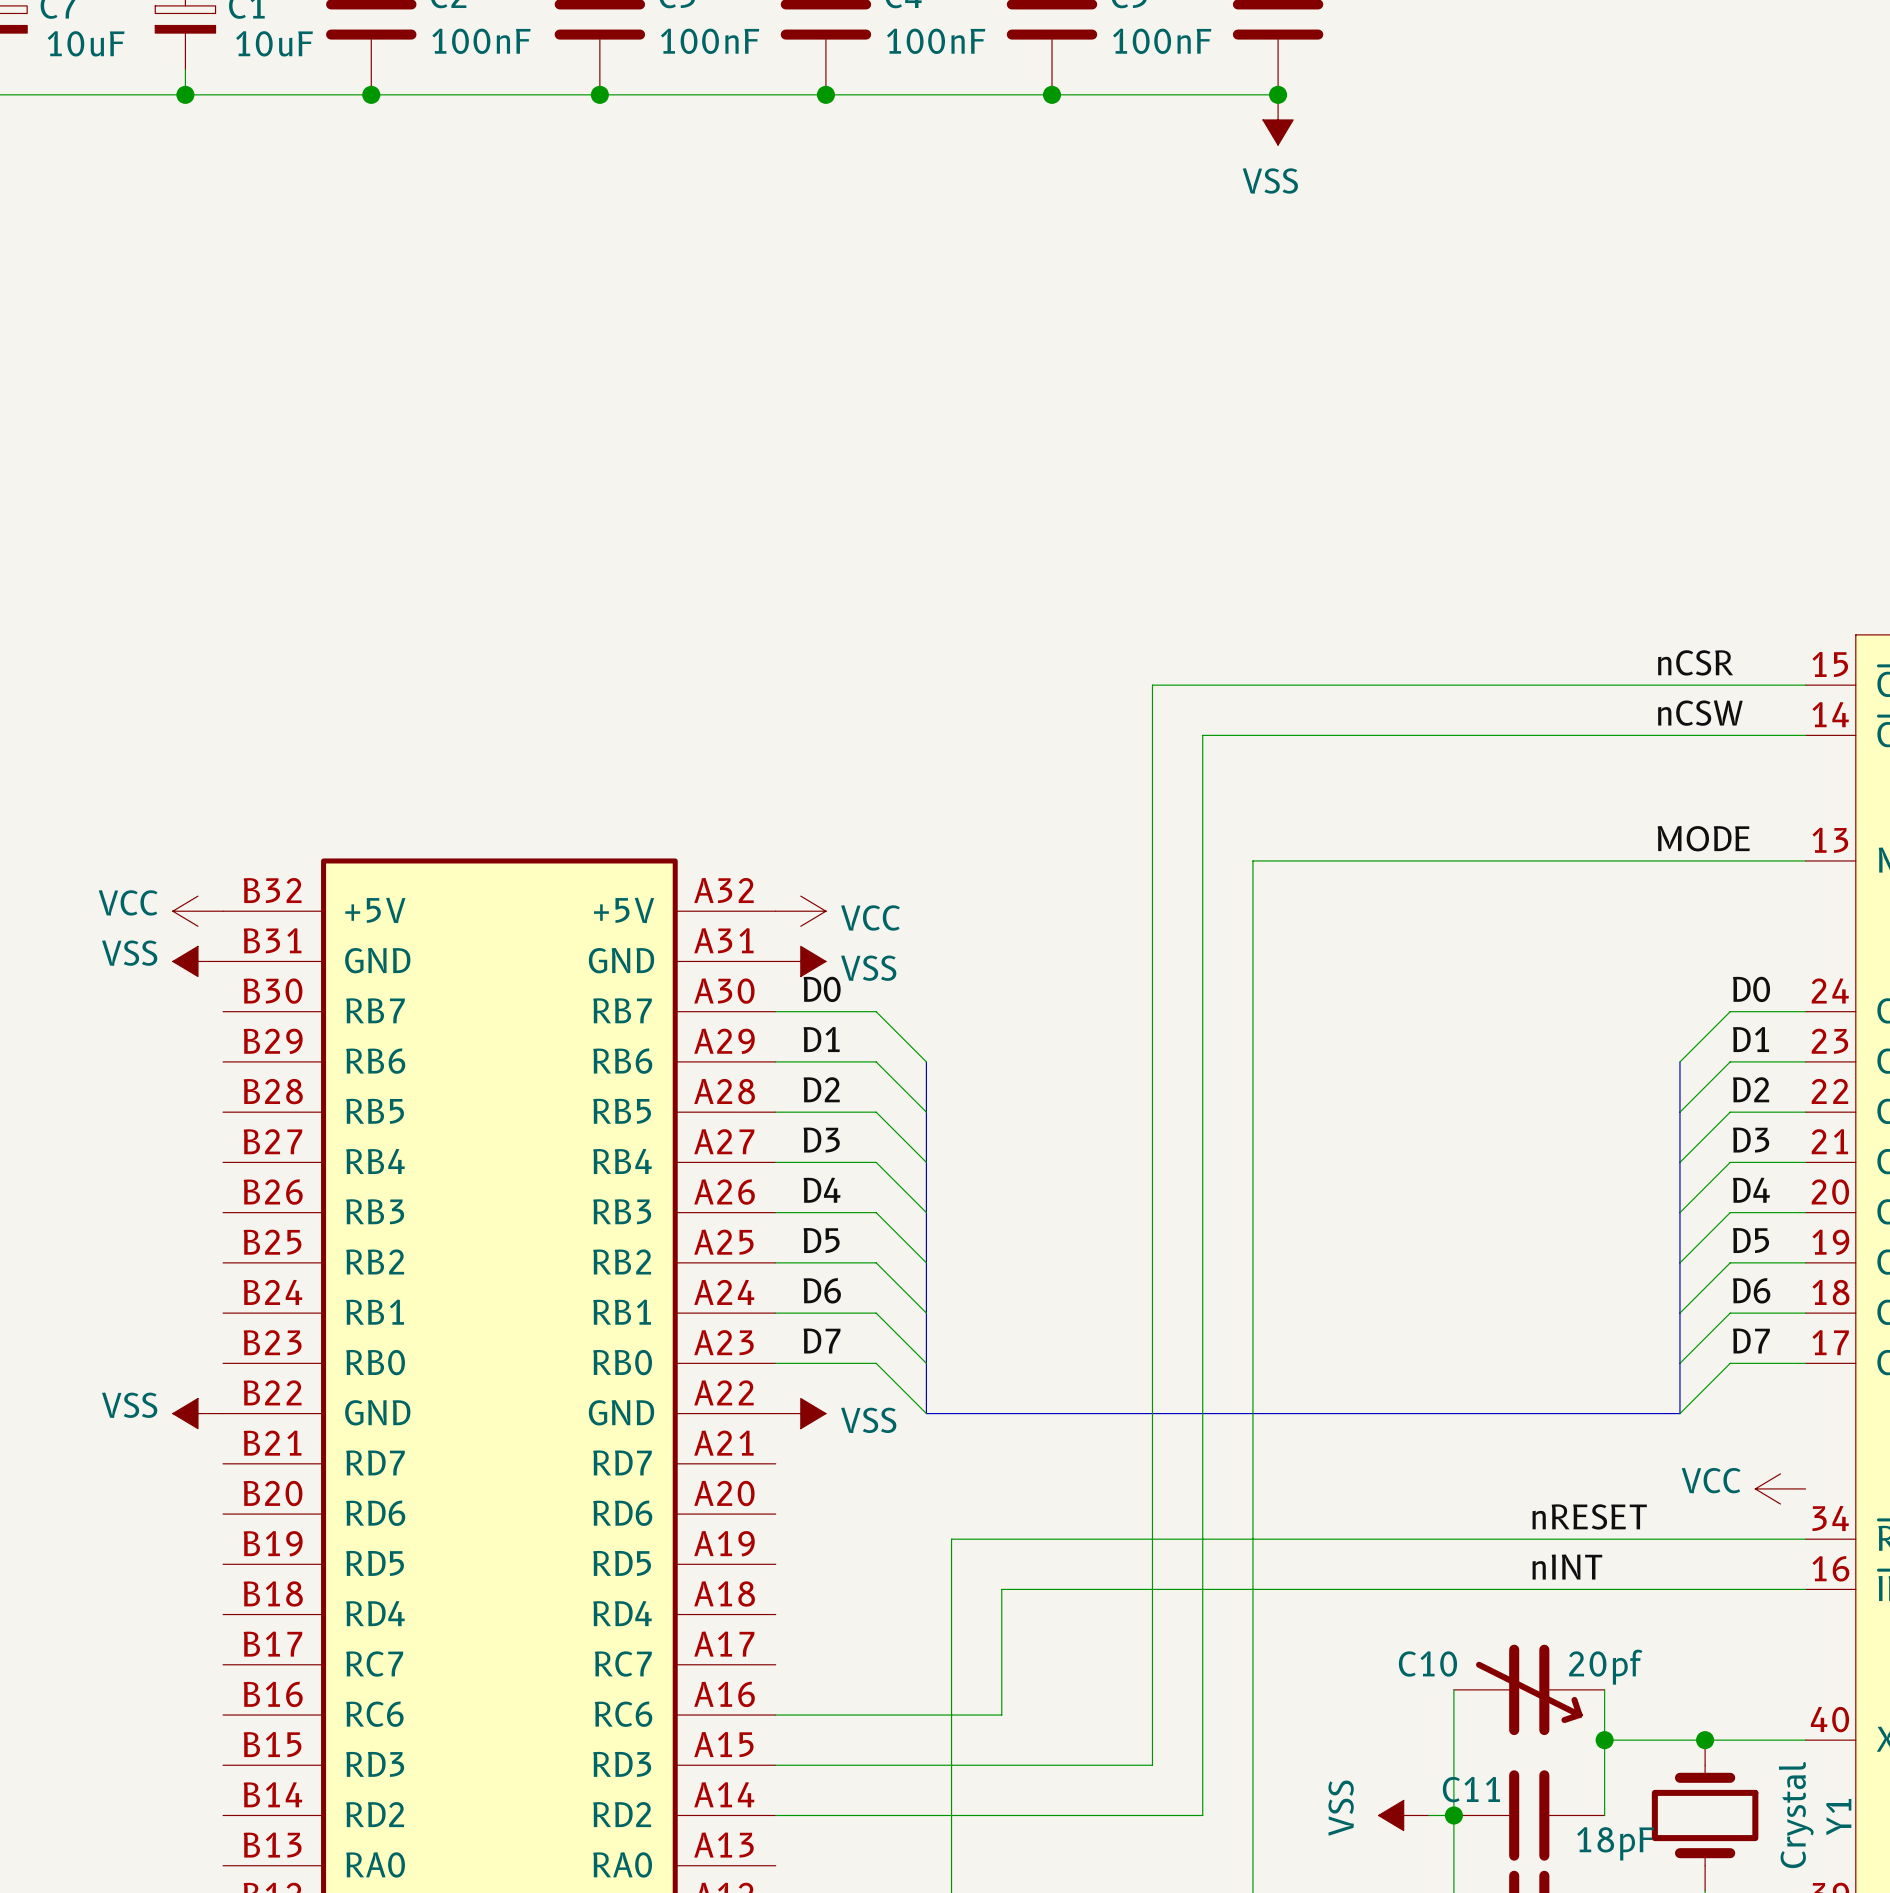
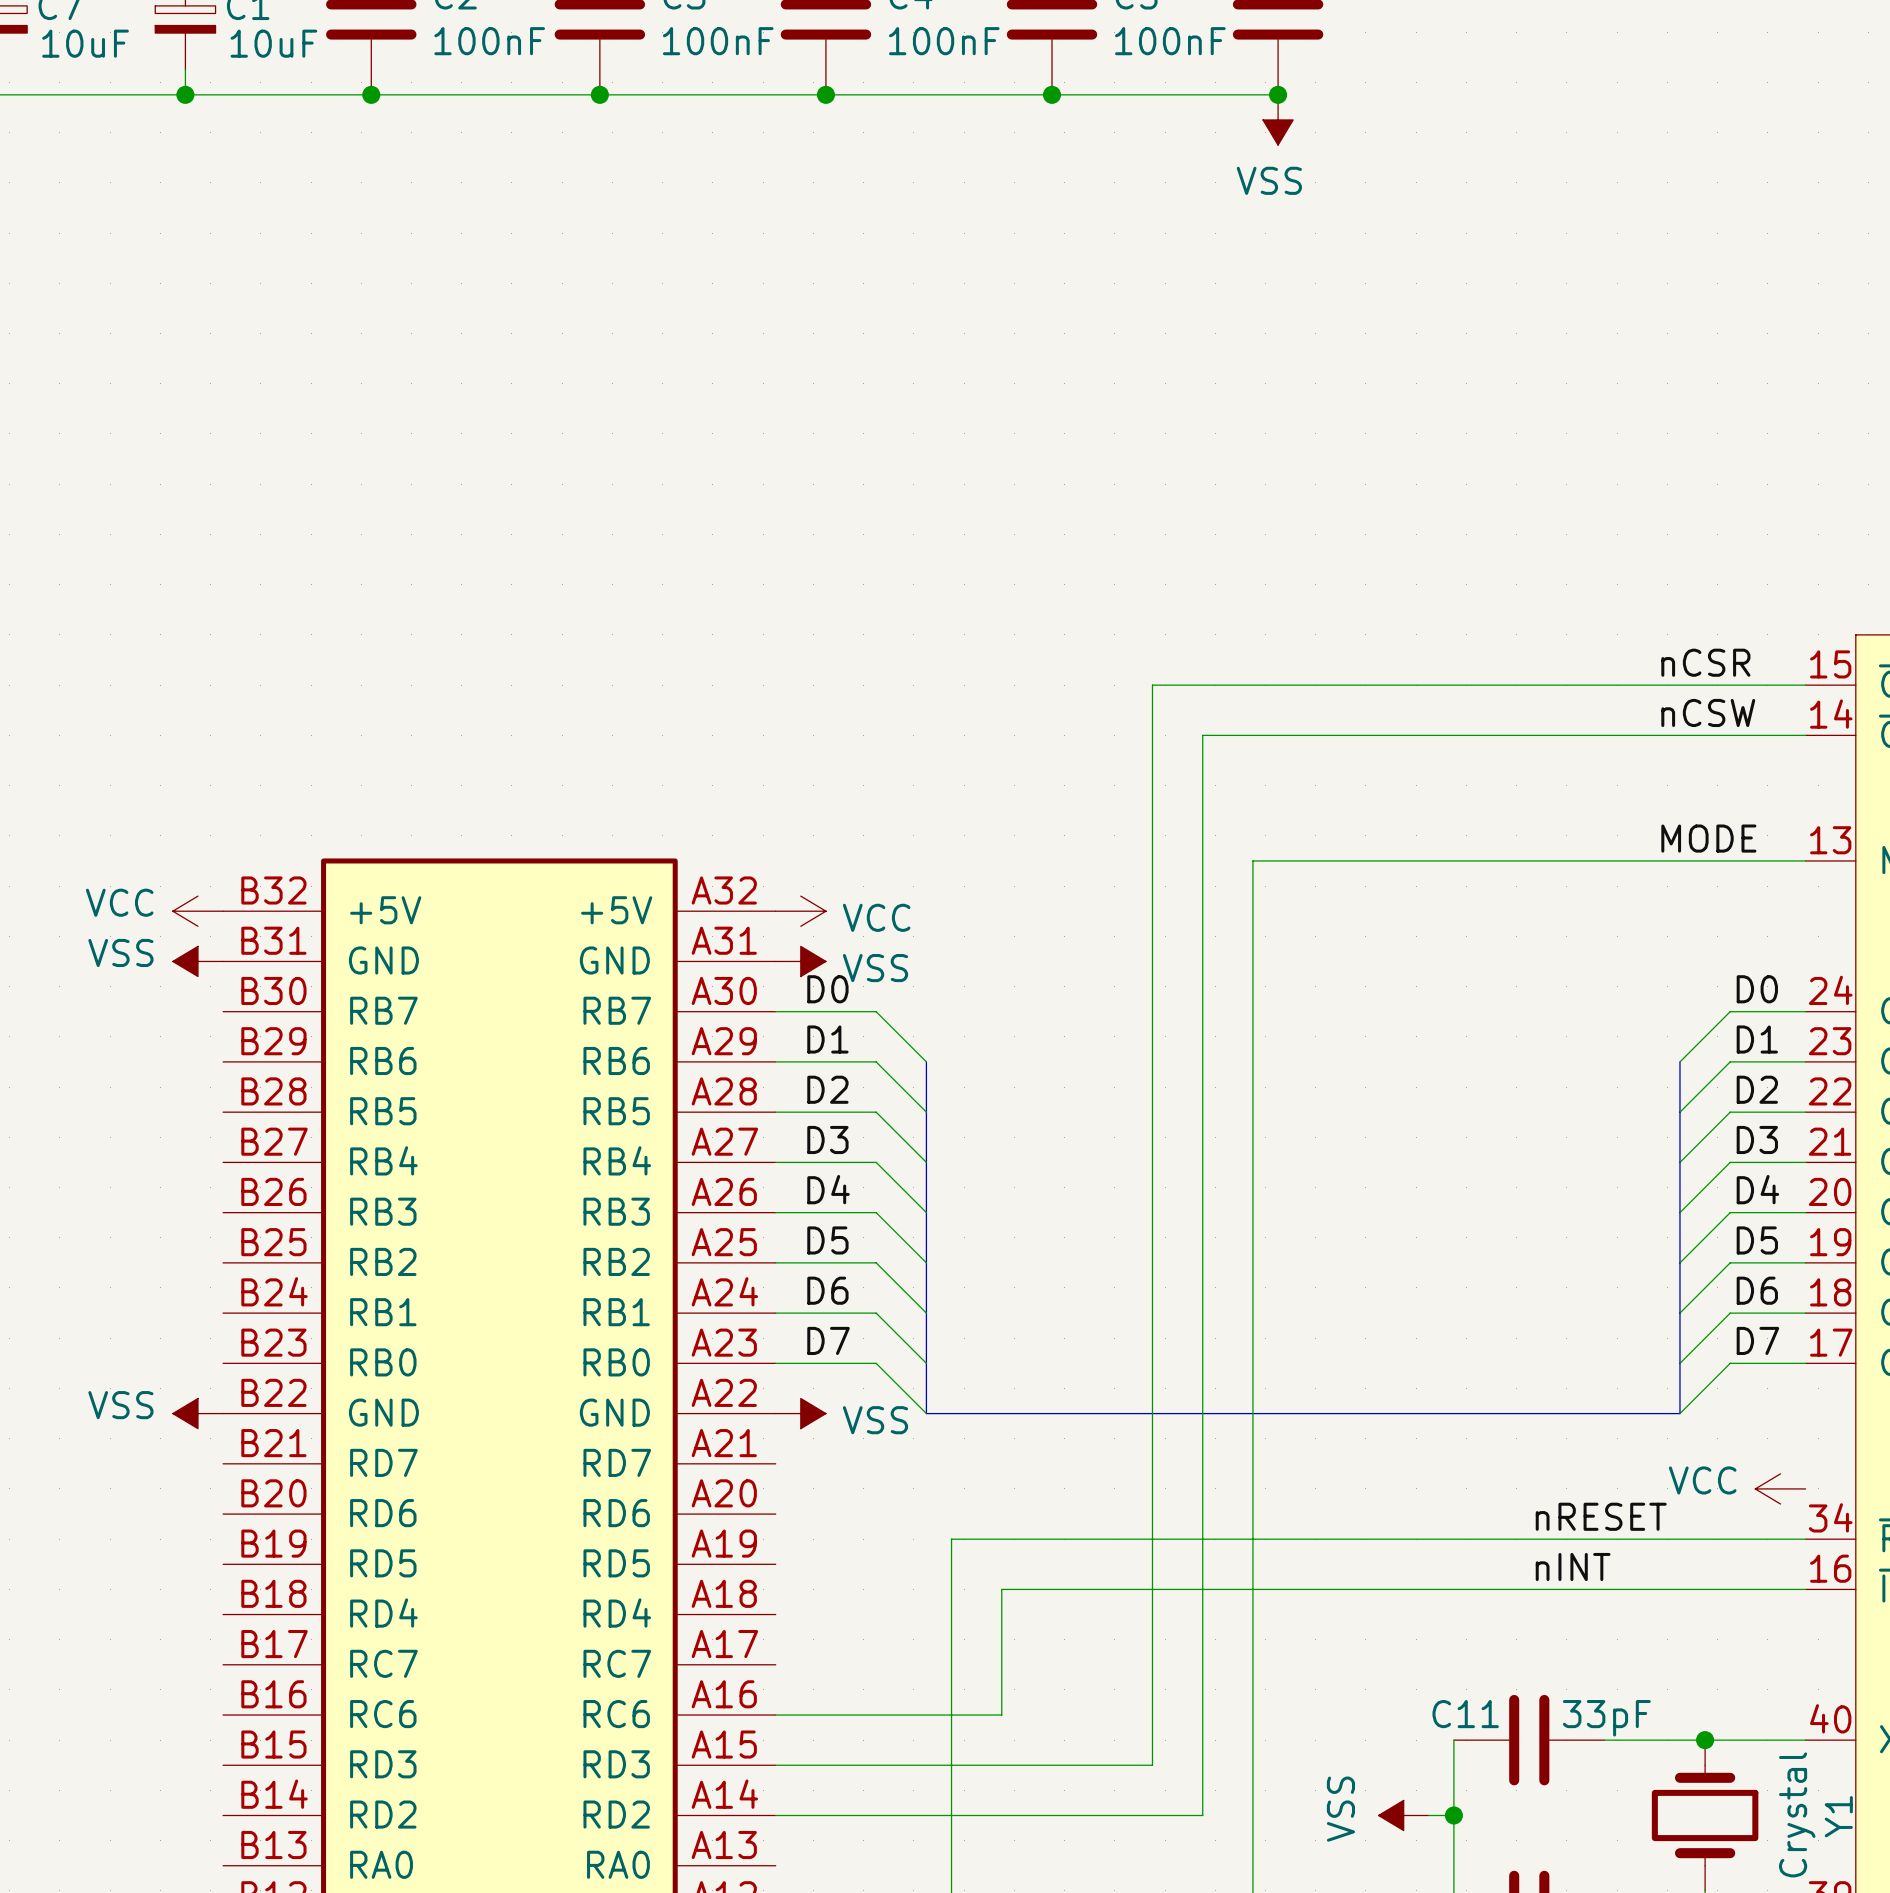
wire: (1453, 1689) (1453, 1740) -> none
C10: 20pf (1529, 1689) -> none
wire: (1604, 1689) (1604, 1815) -> none
junction: (1604, 1740) -> none
C11 position: (1529, 1815) -> (1529, 1740)
C11 value: 18pF (1615, 1843) -> 33pF (1606, 1718)

